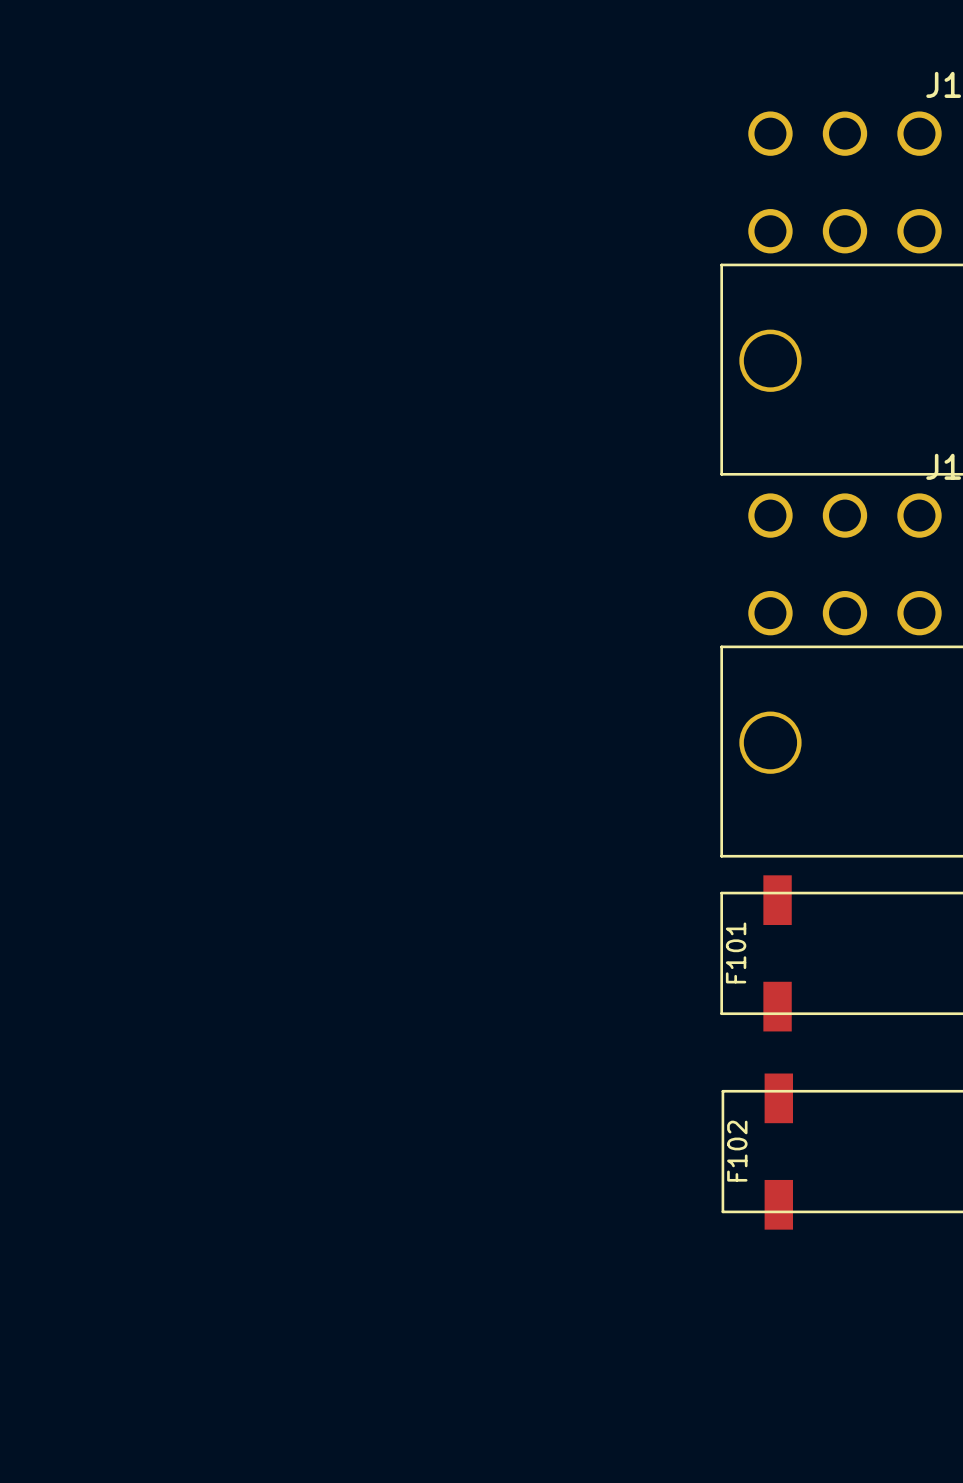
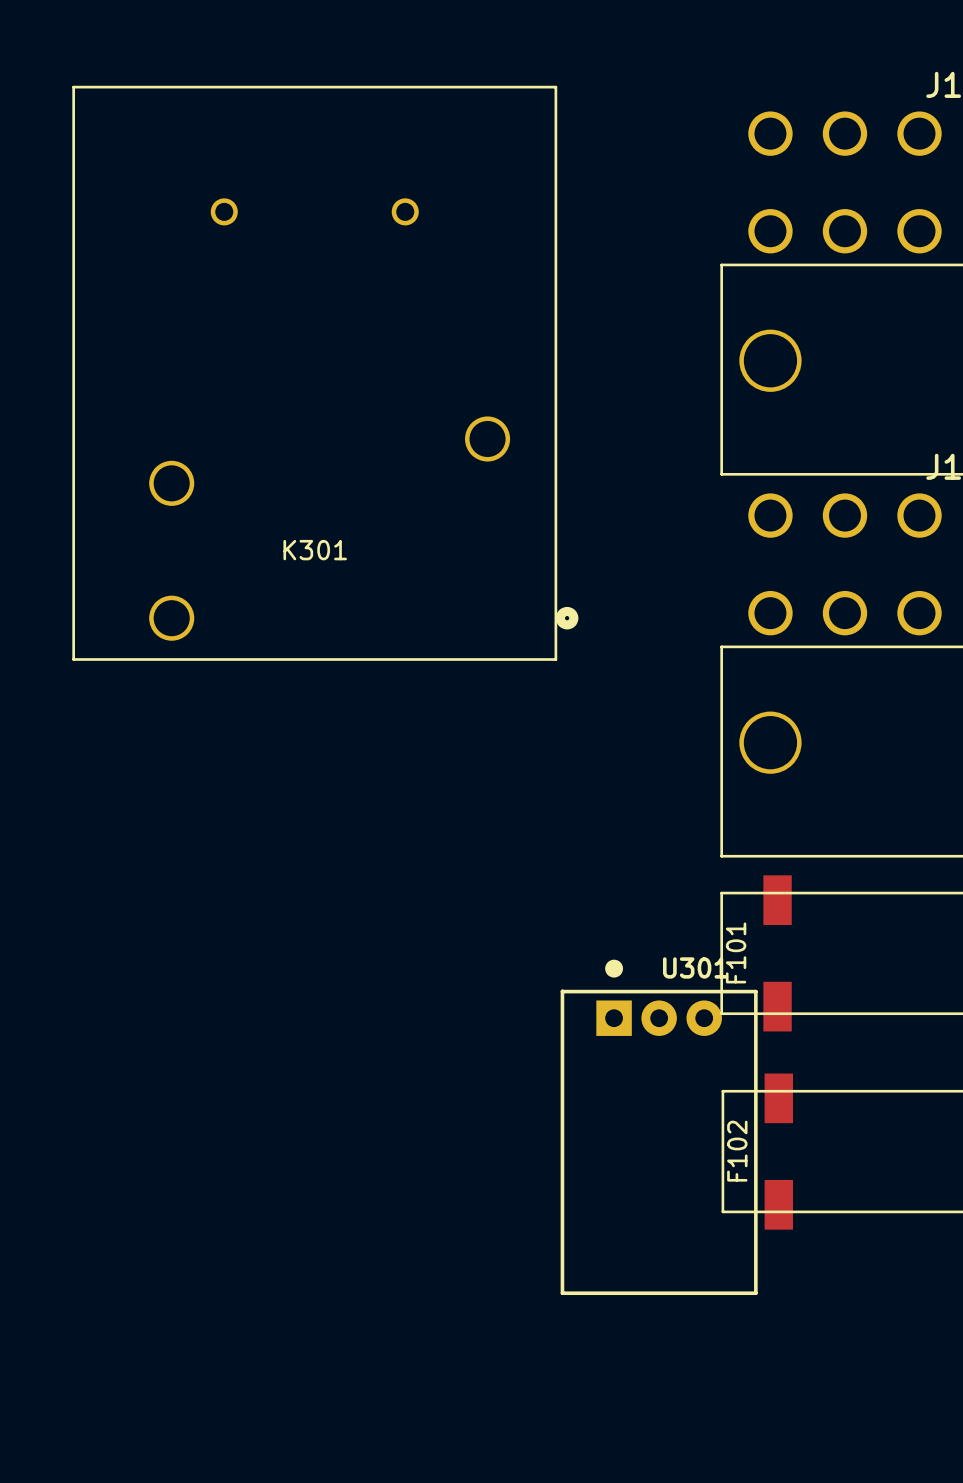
K301: none -> (325, 373)
U301: none -> (659, 1127)

